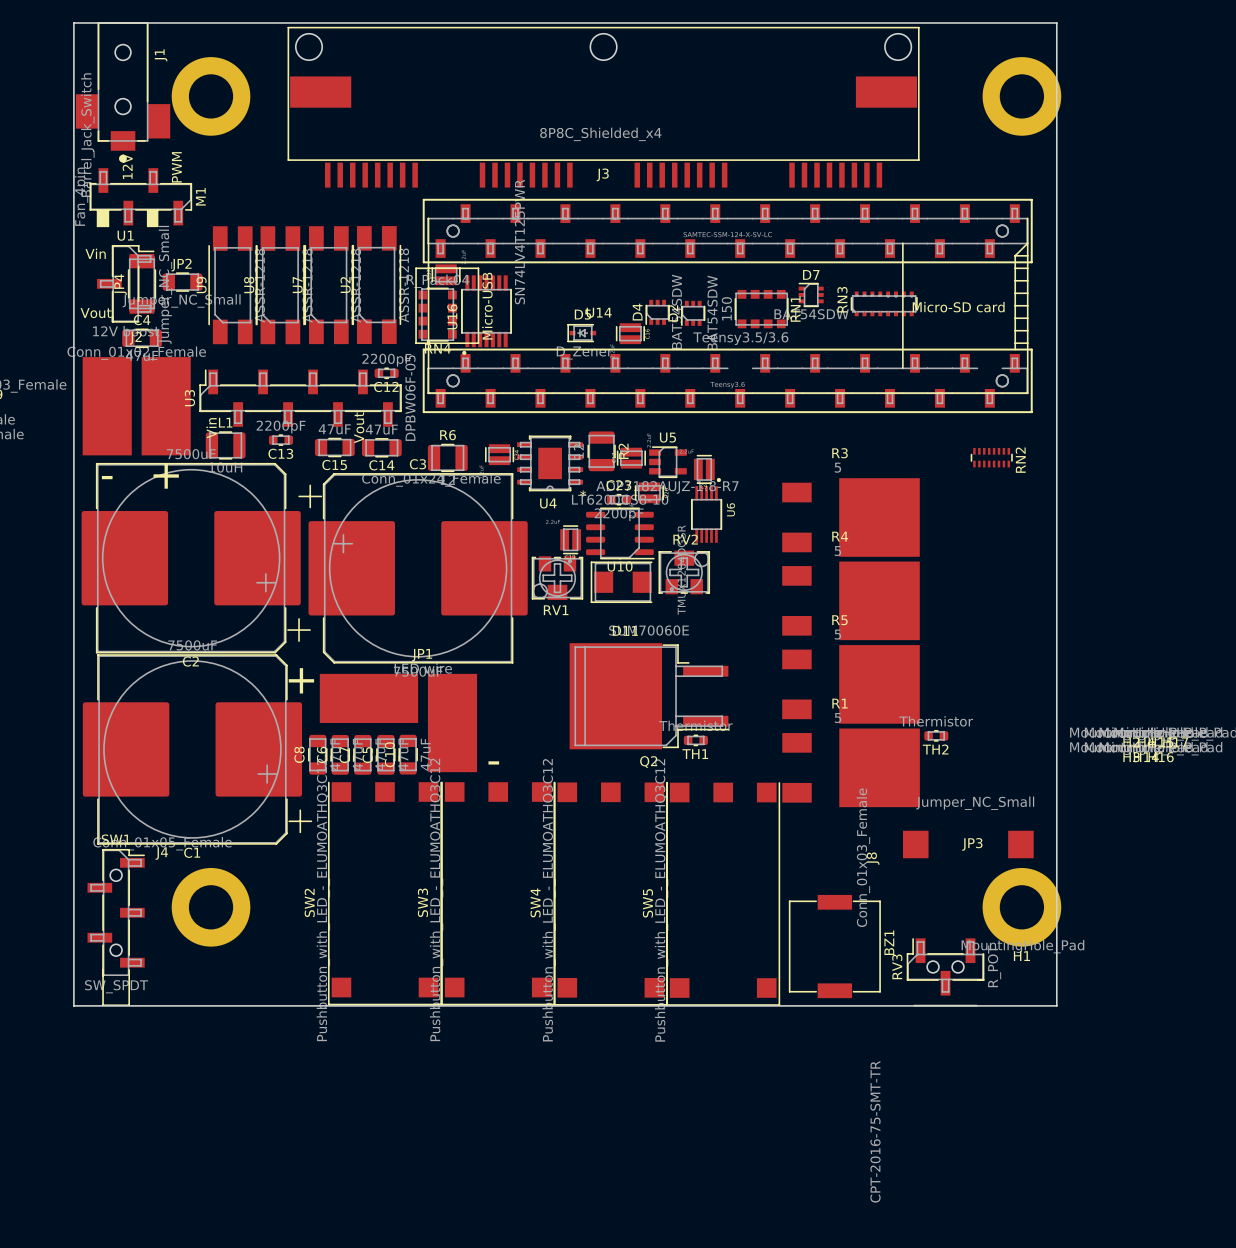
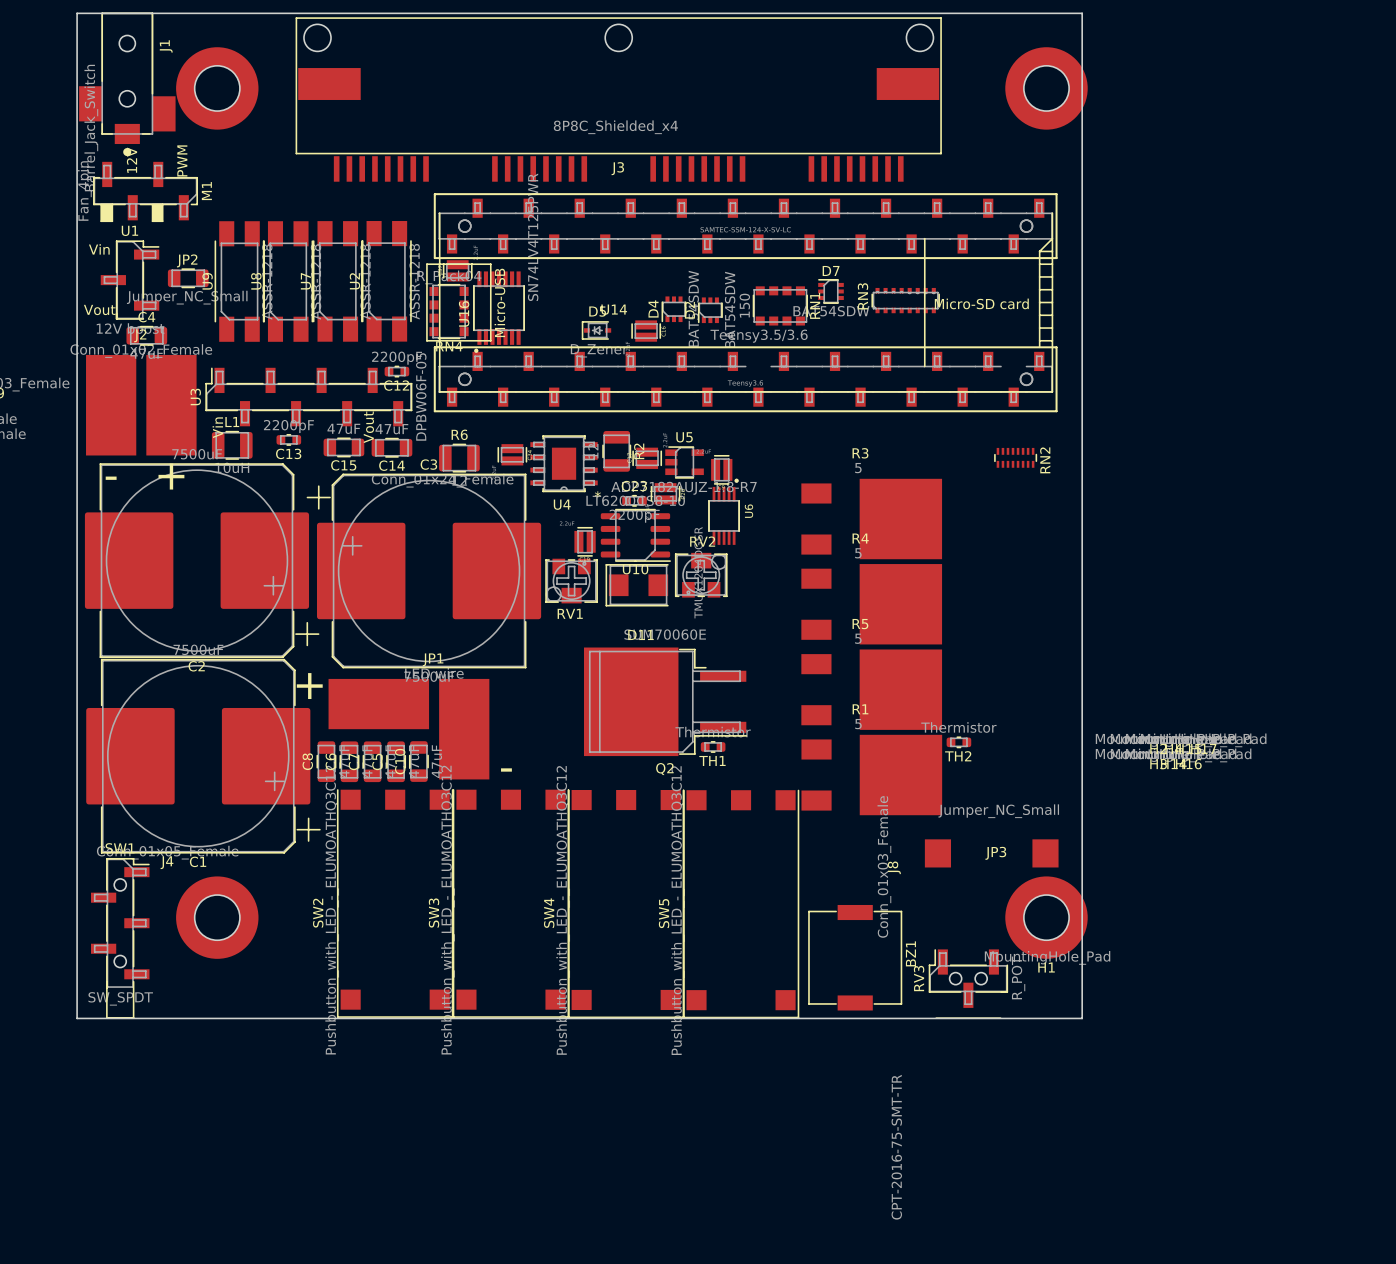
H1 footprint: [171, 57, 1062, 947] -> [176, 47, 1088, 959]
JP4: Jumper_NC_Small (142, 283) -> none

